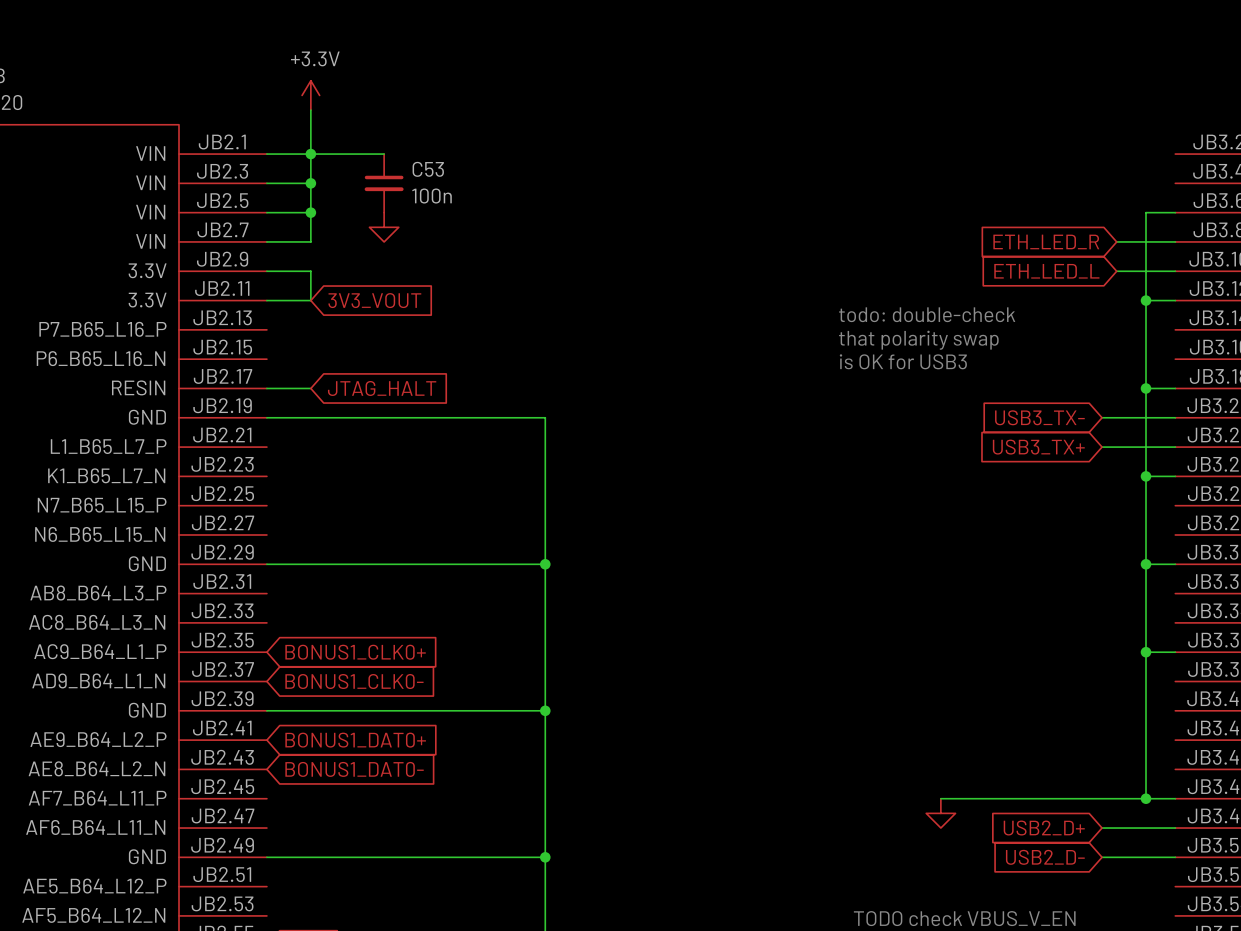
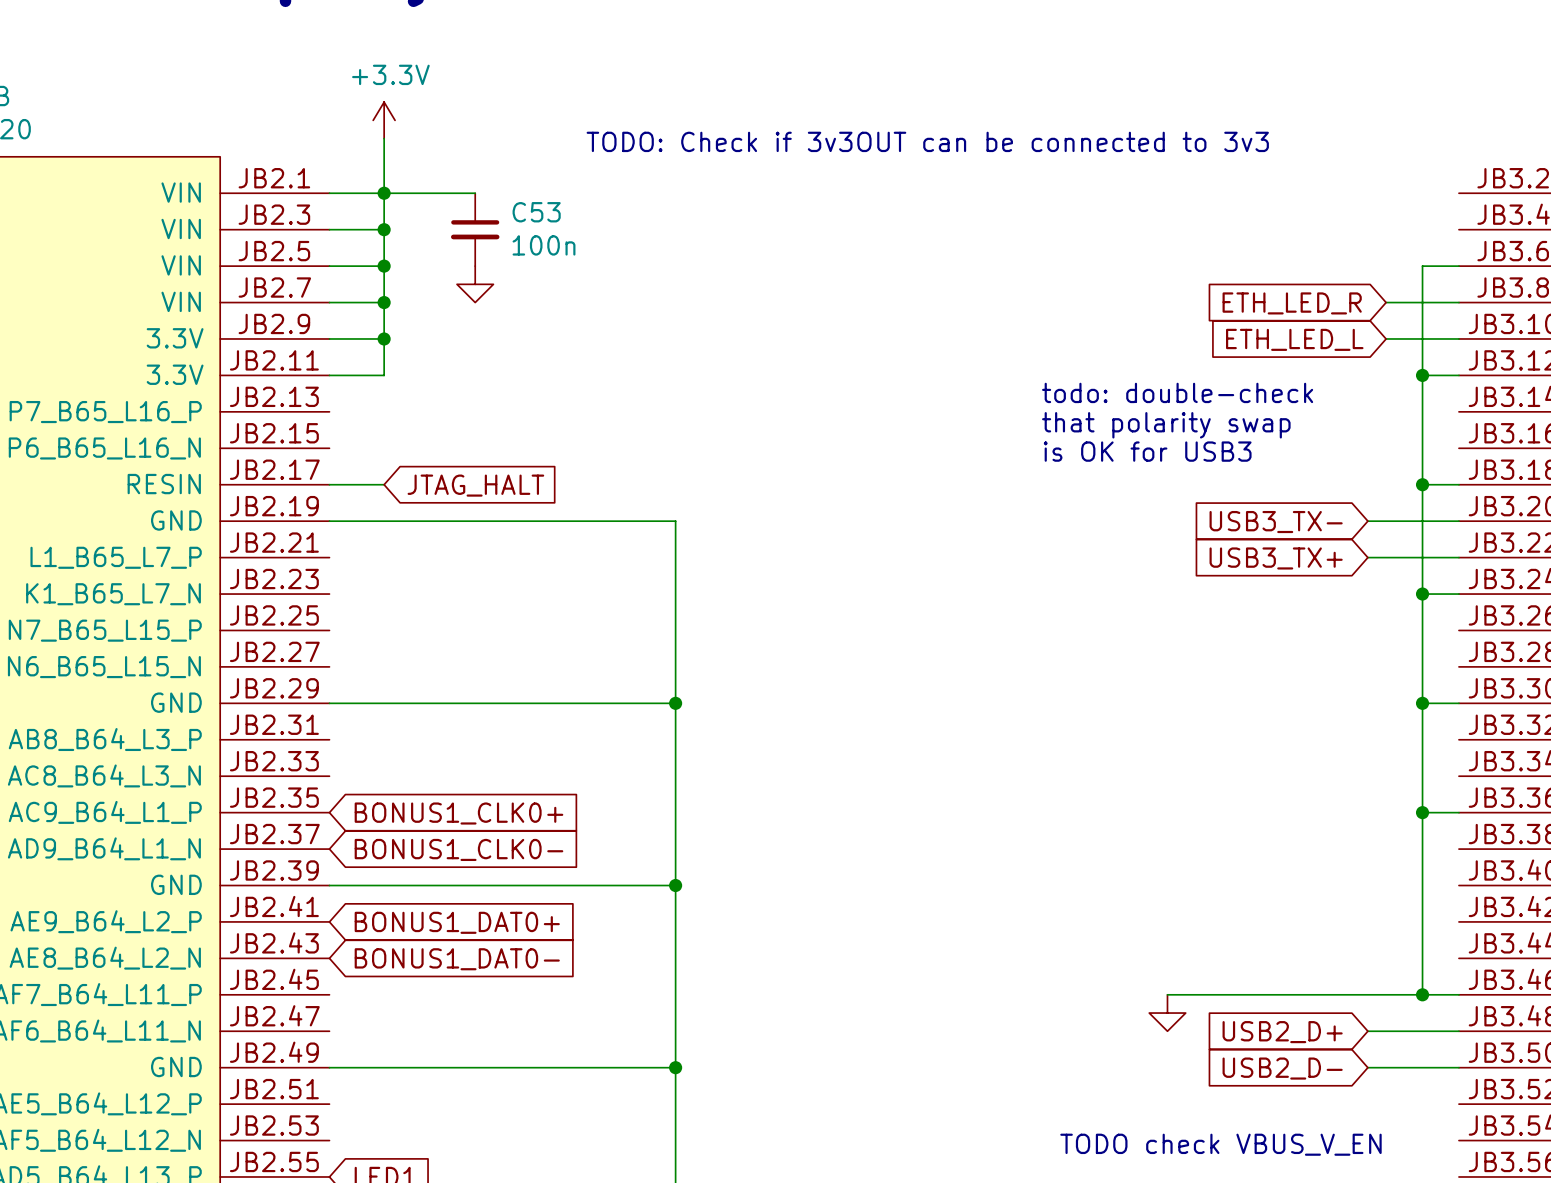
text: none -> TODO: Check if 3v3OUT can be connected to 3v3 (927, 141)
wire: none -> (384, 302) (384, 338)
junction: none -> (384, 302)
junction: none -> (384, 338)
global label: 3V3_VOUT (374, 300) -> none

